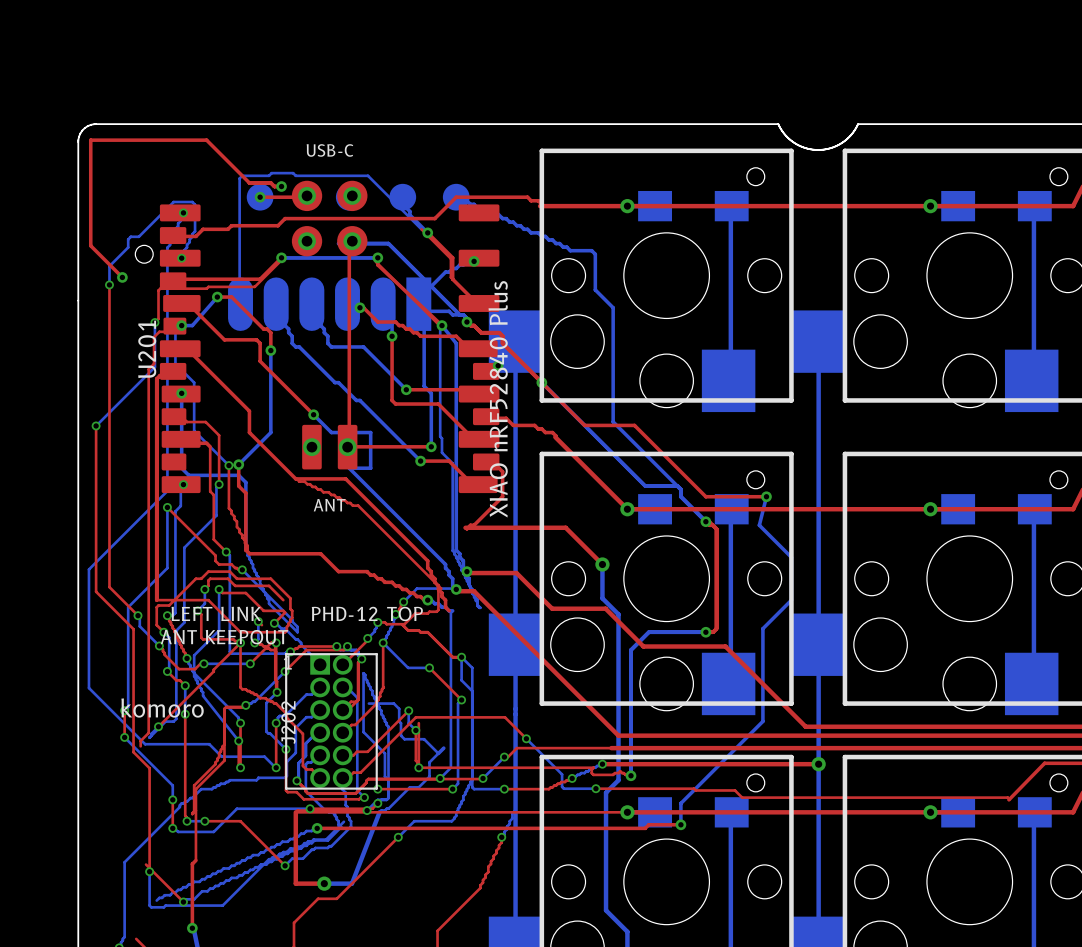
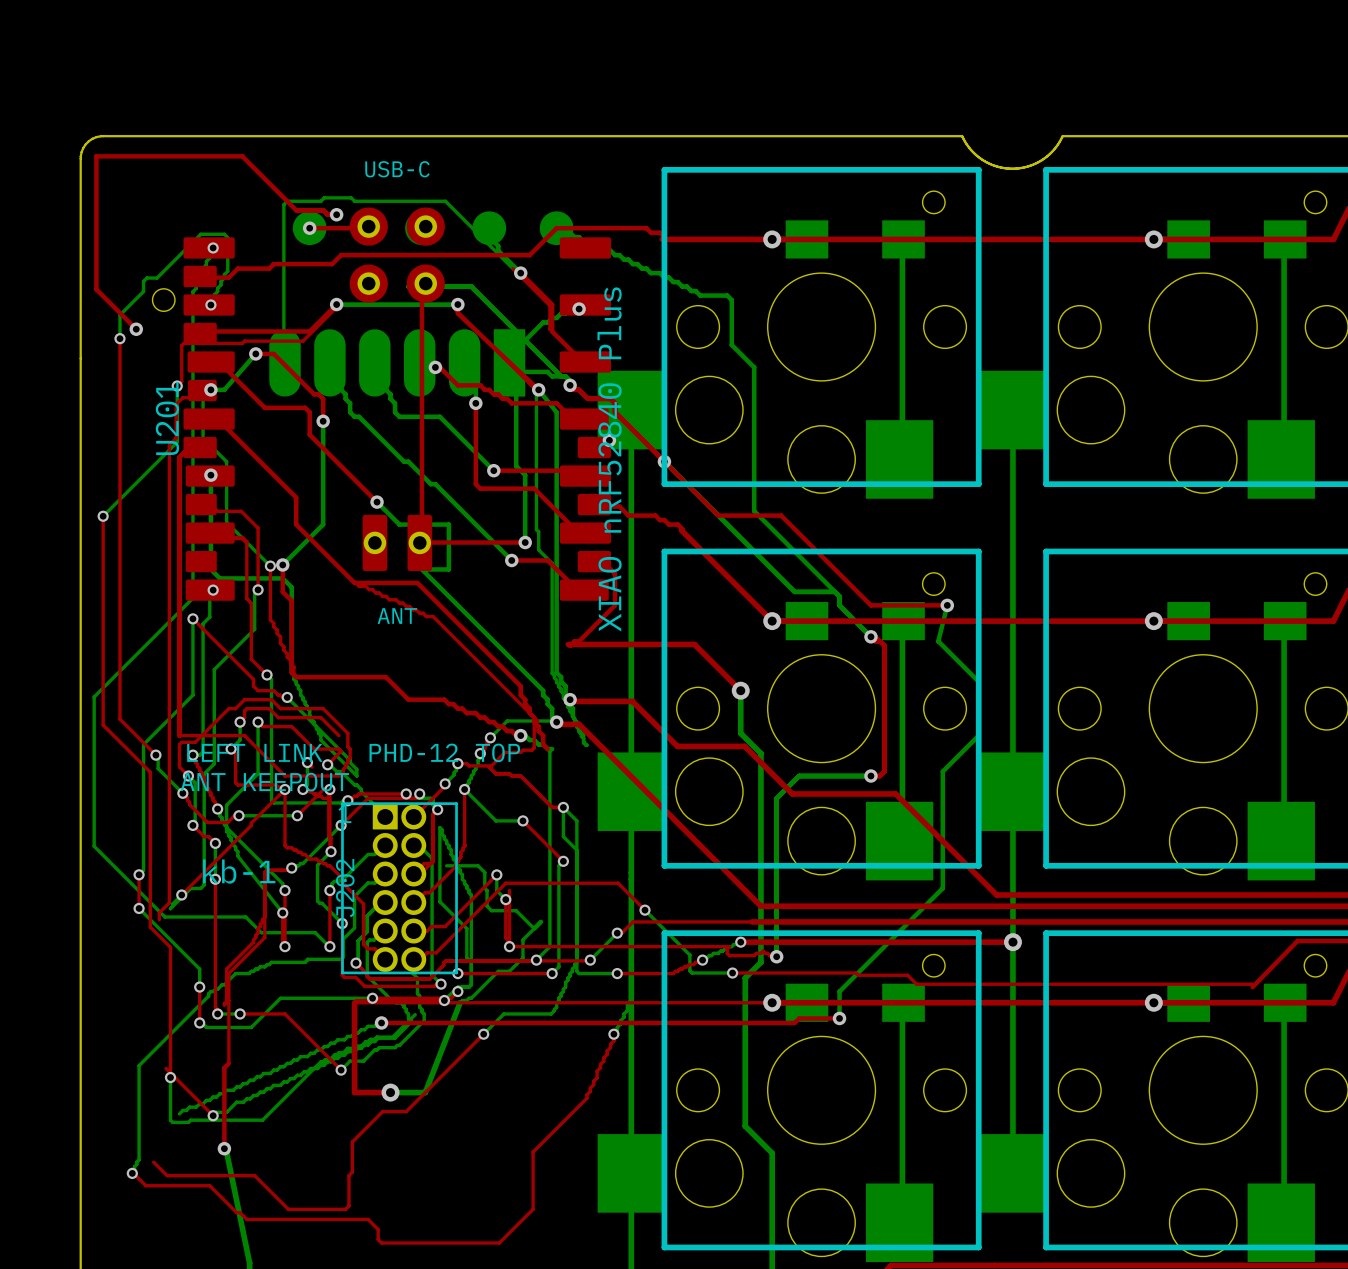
text: komoro (162, 708) -> none
text: none -> kb-1 (239, 871)

